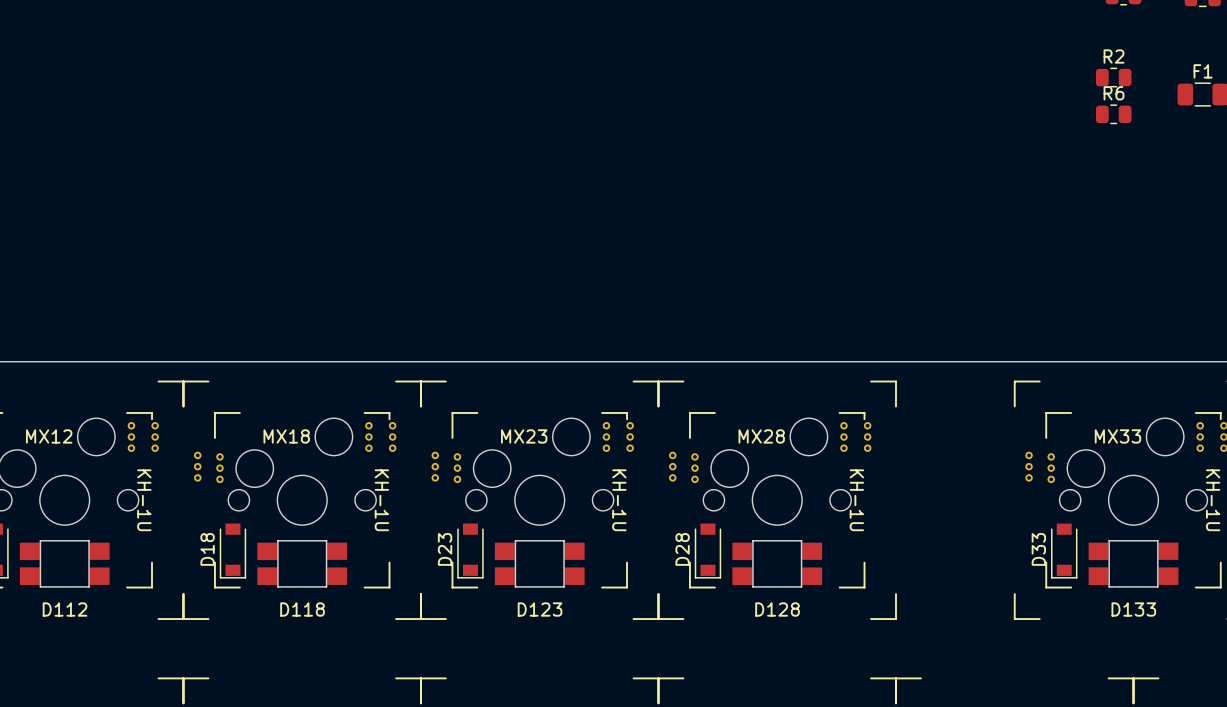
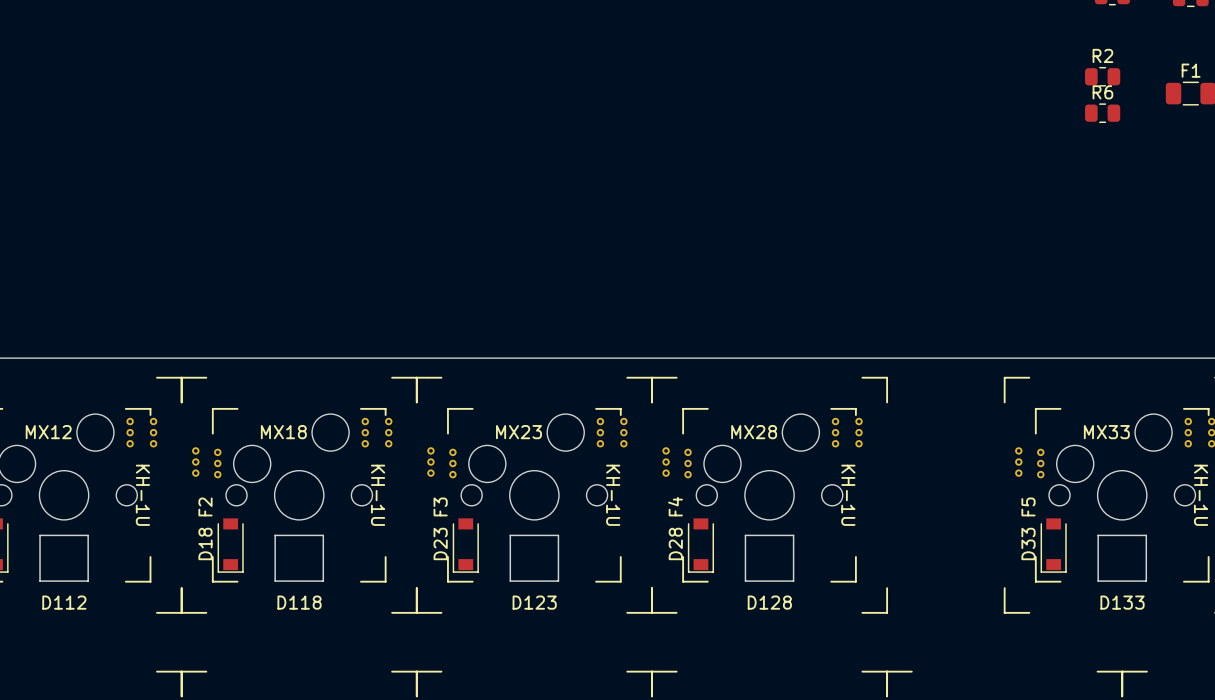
D28 value: none -> F4 (675, 506)
D18 value: none -> F2 (205, 506)
D23 value: none -> F3 (440, 506)
D33 value: none -> F5 (1028, 506)
D112 footprint: [19, 540, 110, 588] -> [39, 534, 89, 582]
D118 footprint: [257, 540, 348, 588] -> [274, 534, 325, 582]
D123 footprint: [494, 540, 585, 588] -> [509, 534, 560, 582]
D128 footprint: [732, 540, 823, 588] -> [744, 534, 795, 582]
D133 footprint: [1088, 540, 1179, 588] -> [1097, 534, 1148, 582]

